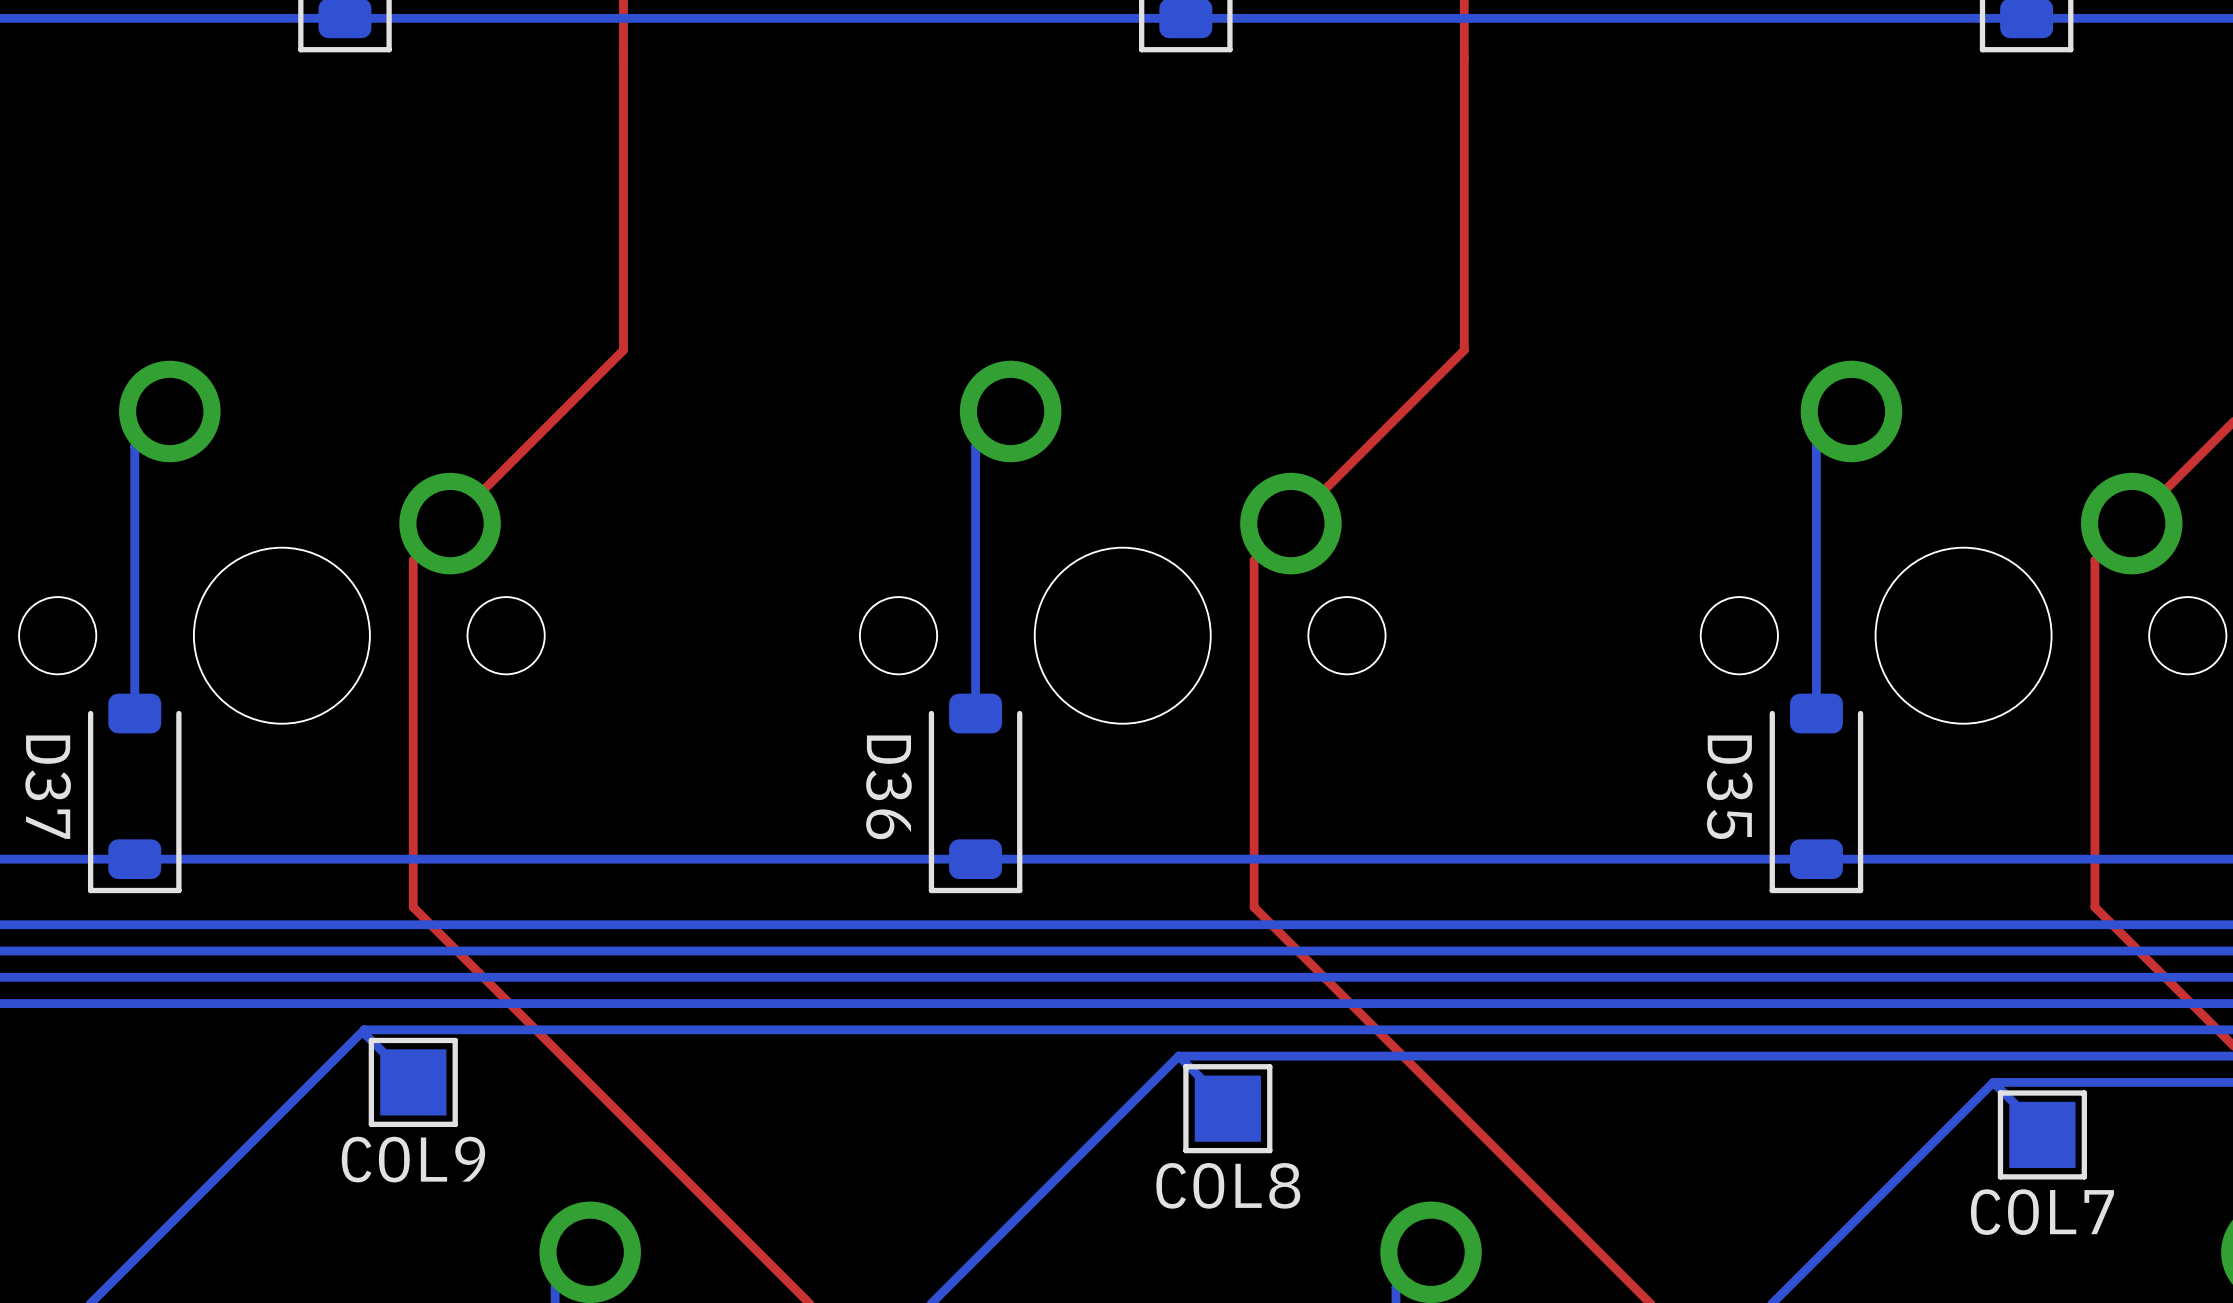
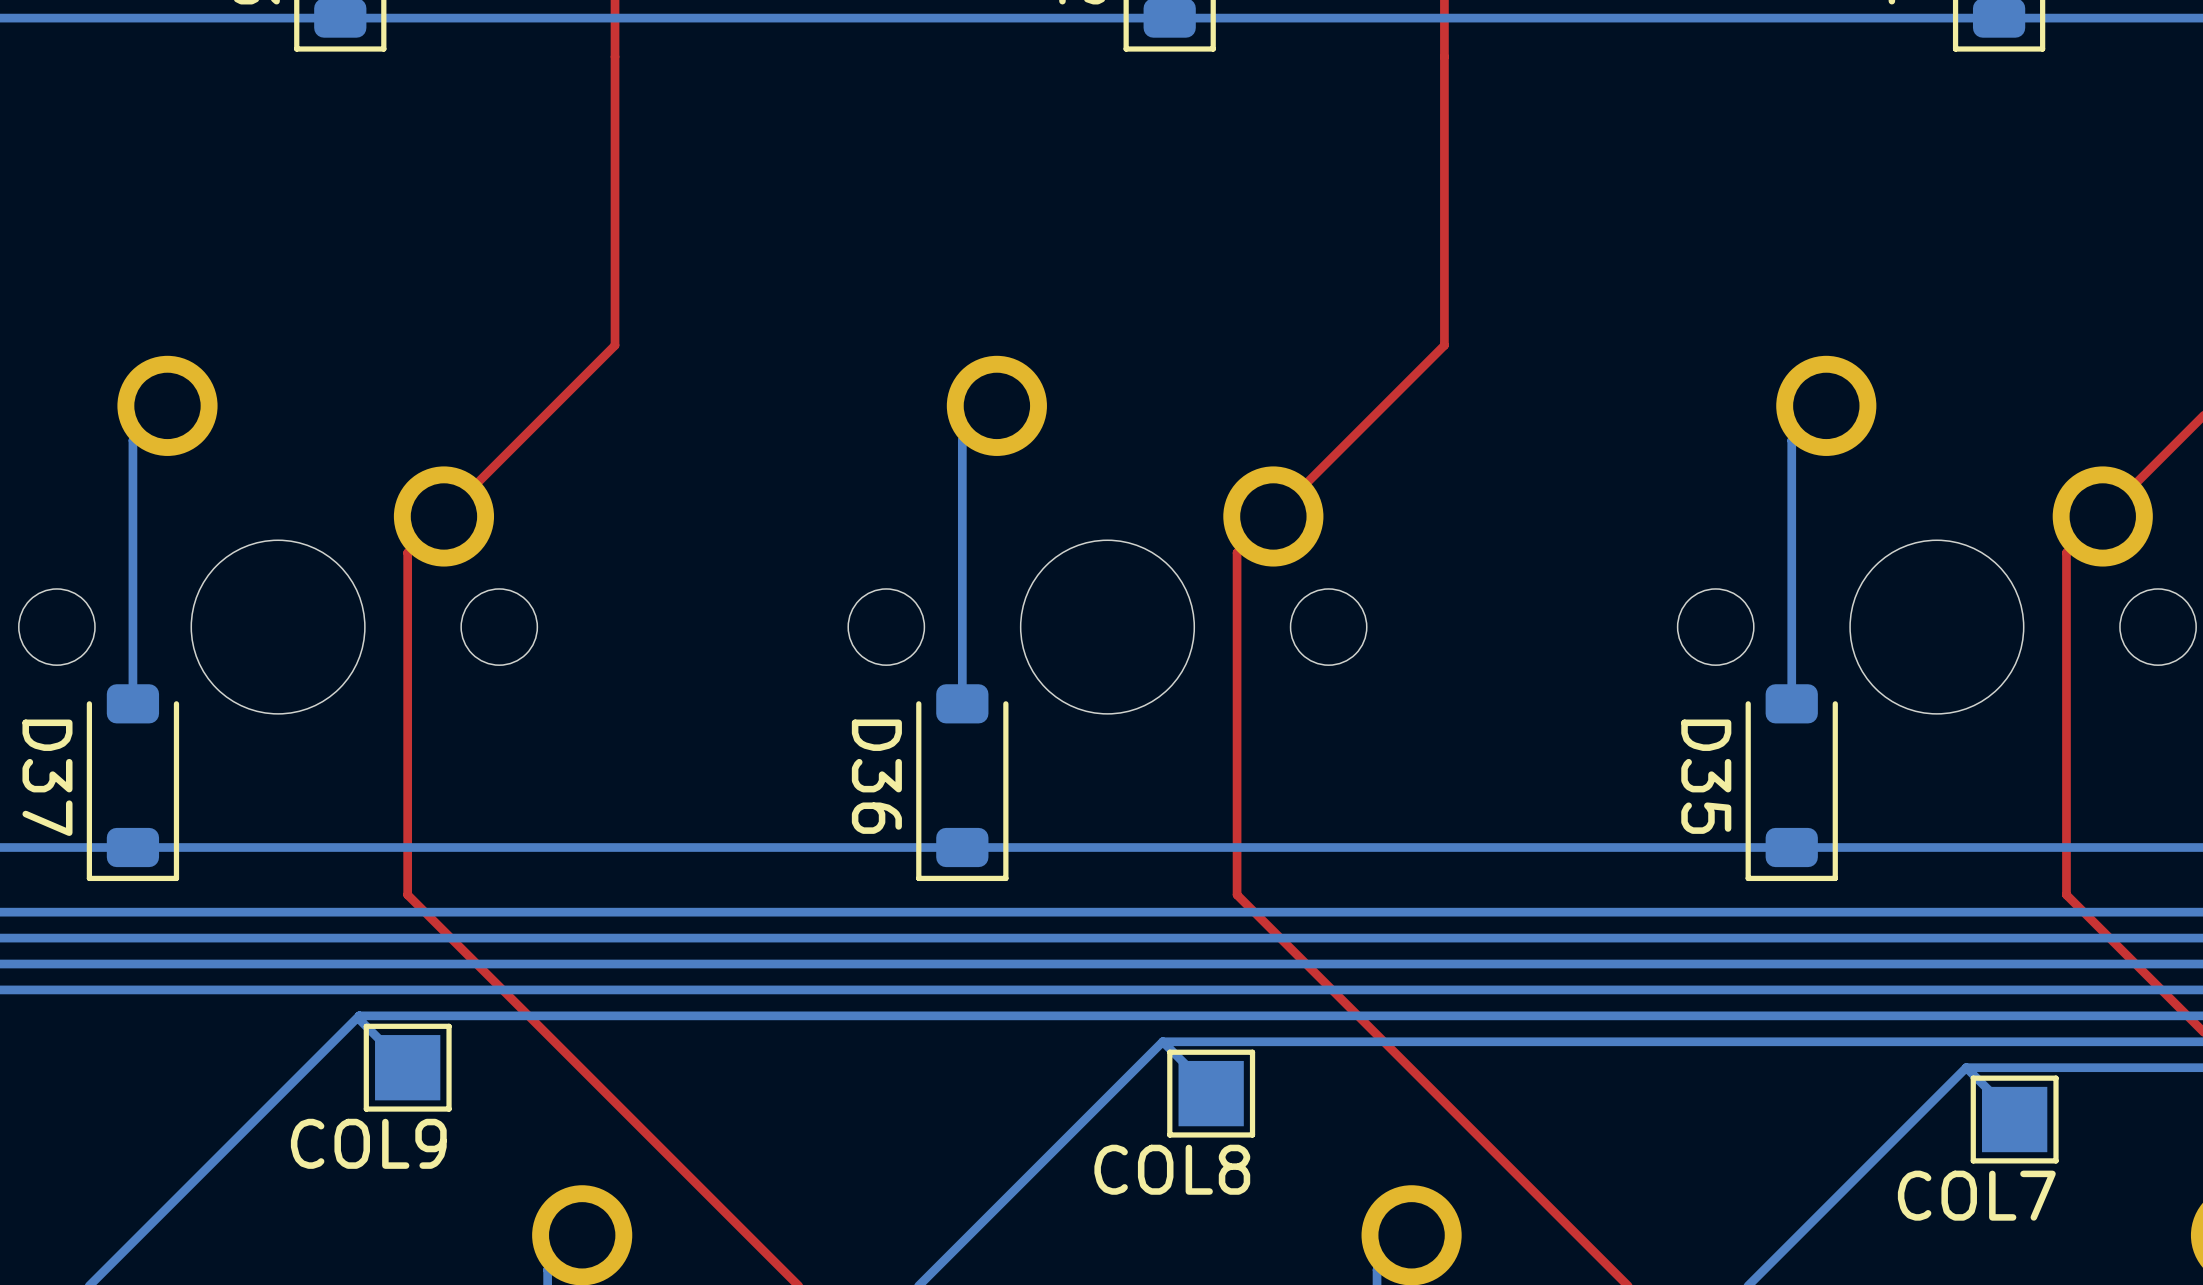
COL9 name position: COL9 (413, 1159) -> COL9 (368, 1143)
COL8 name position: COL8 (1228, 1185) -> COL8 (1172, 1169)
COL7 name position: COL7 (2042, 1212) -> COL7 (1976, 1195)

